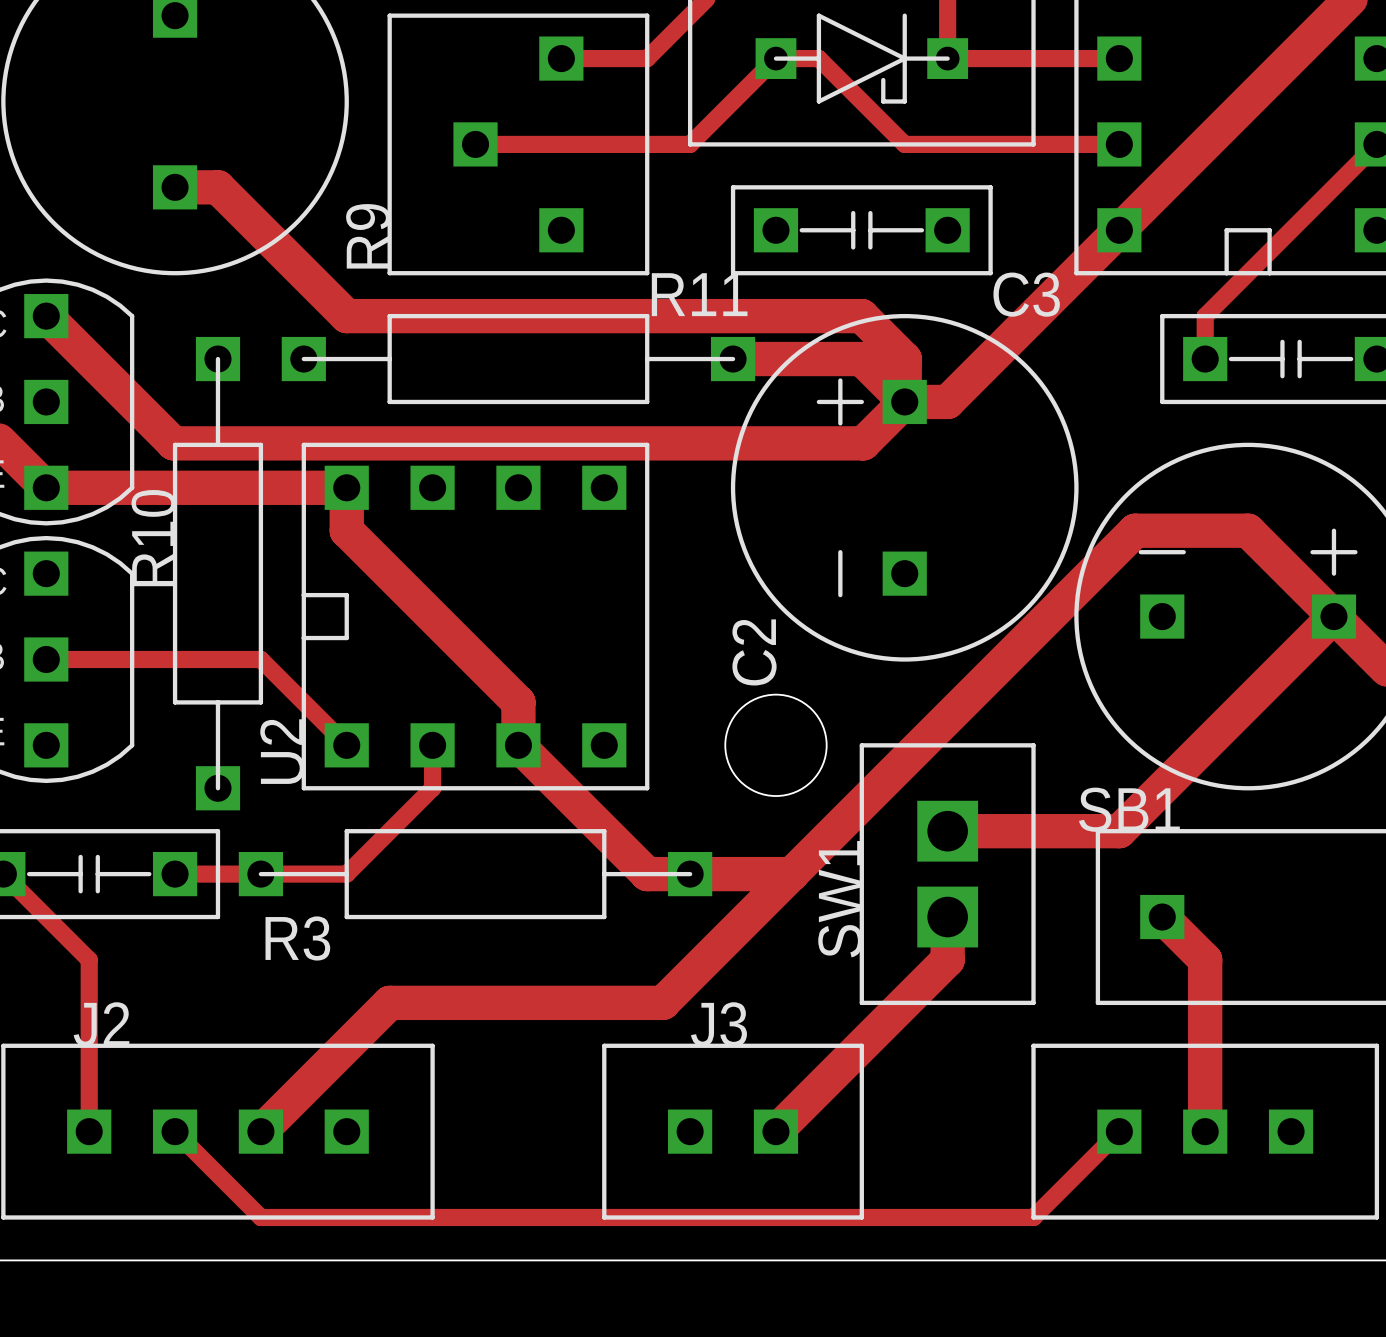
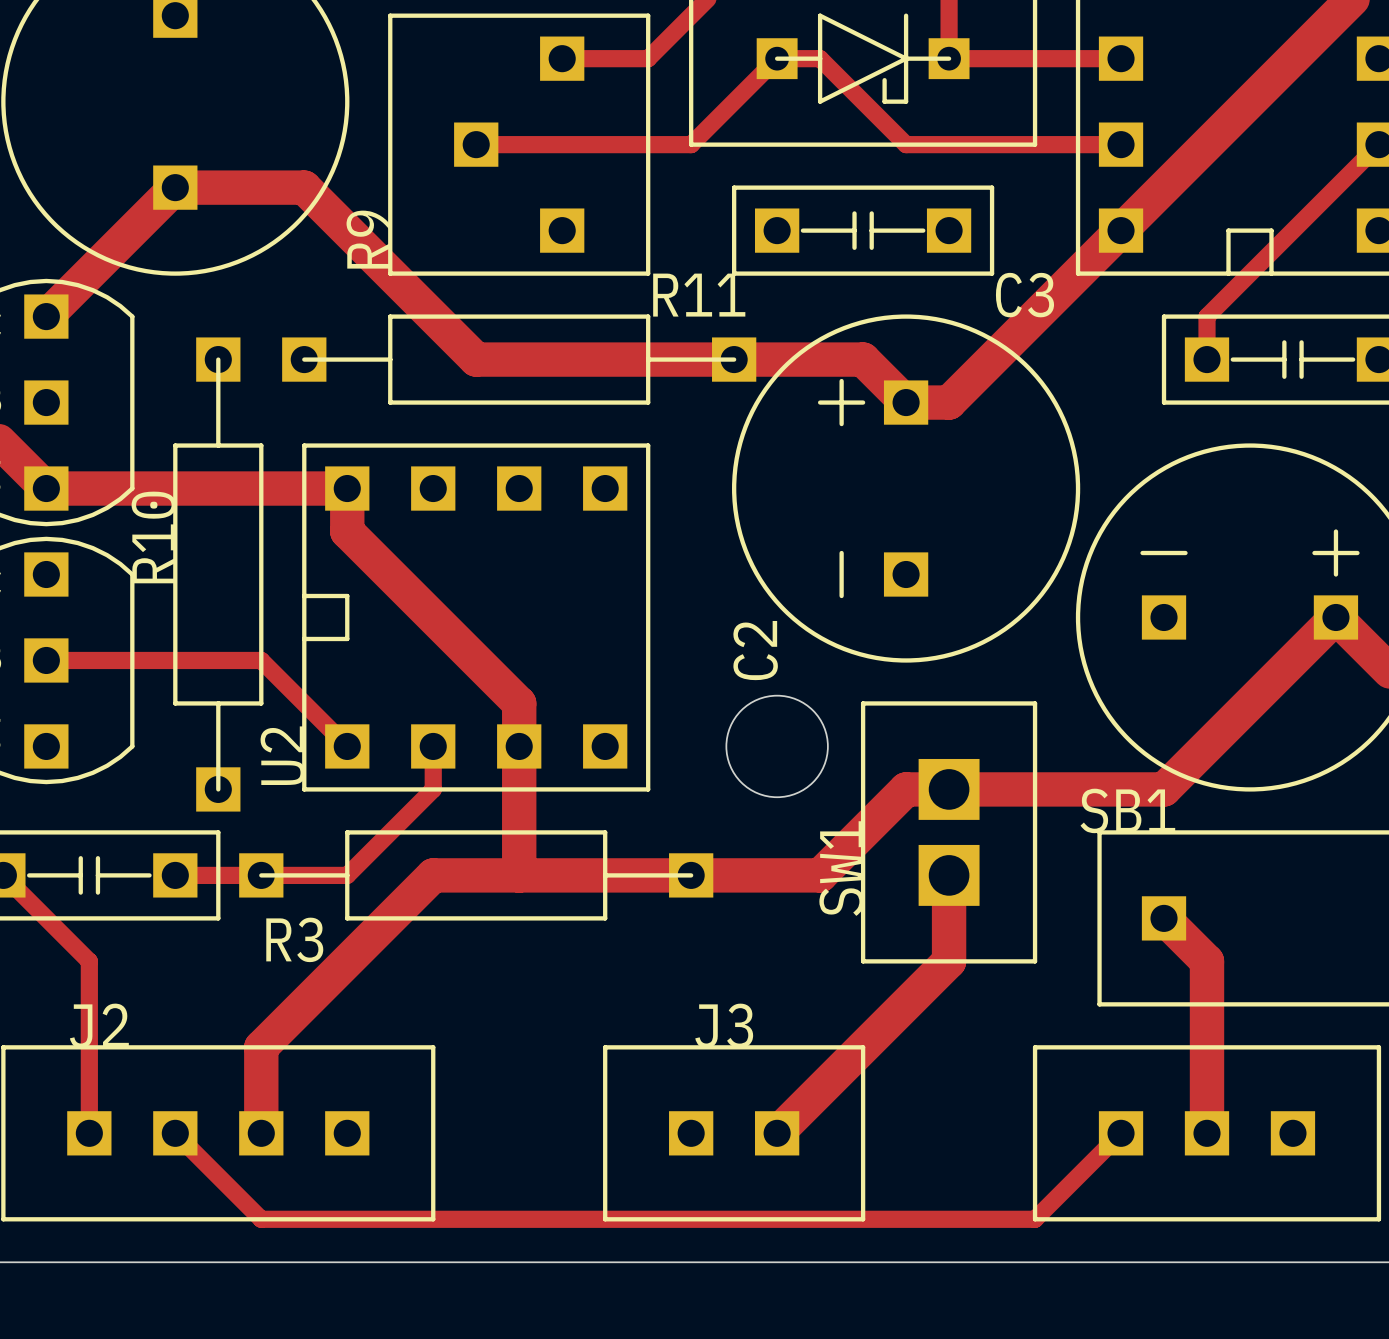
track: (217, 187) (346, 316) (861, 316) (904, 359) (904, 401) (863, 443) (173, 443) (46, 316) -> (175, 187) (46, 316)
track: none -> (218, 187) (304, 187) (476, 359) (734, 359)
track: (1333, 616) (1248, 530) (1135, 530) (662, 1002) (389, 1002) (260, 1131) -> (648, 875) (433, 875) (261, 1047) (261, 1133)
track: (518, 745) (647, 874) -> (519, 746) (519, 875)
track: (1162, 788) (1119, 831) (947, 831) -> (1164, 789) (906, 789) (820, 875) (792, 875)
SW1 position: (947, 874) -> (949, 832)

